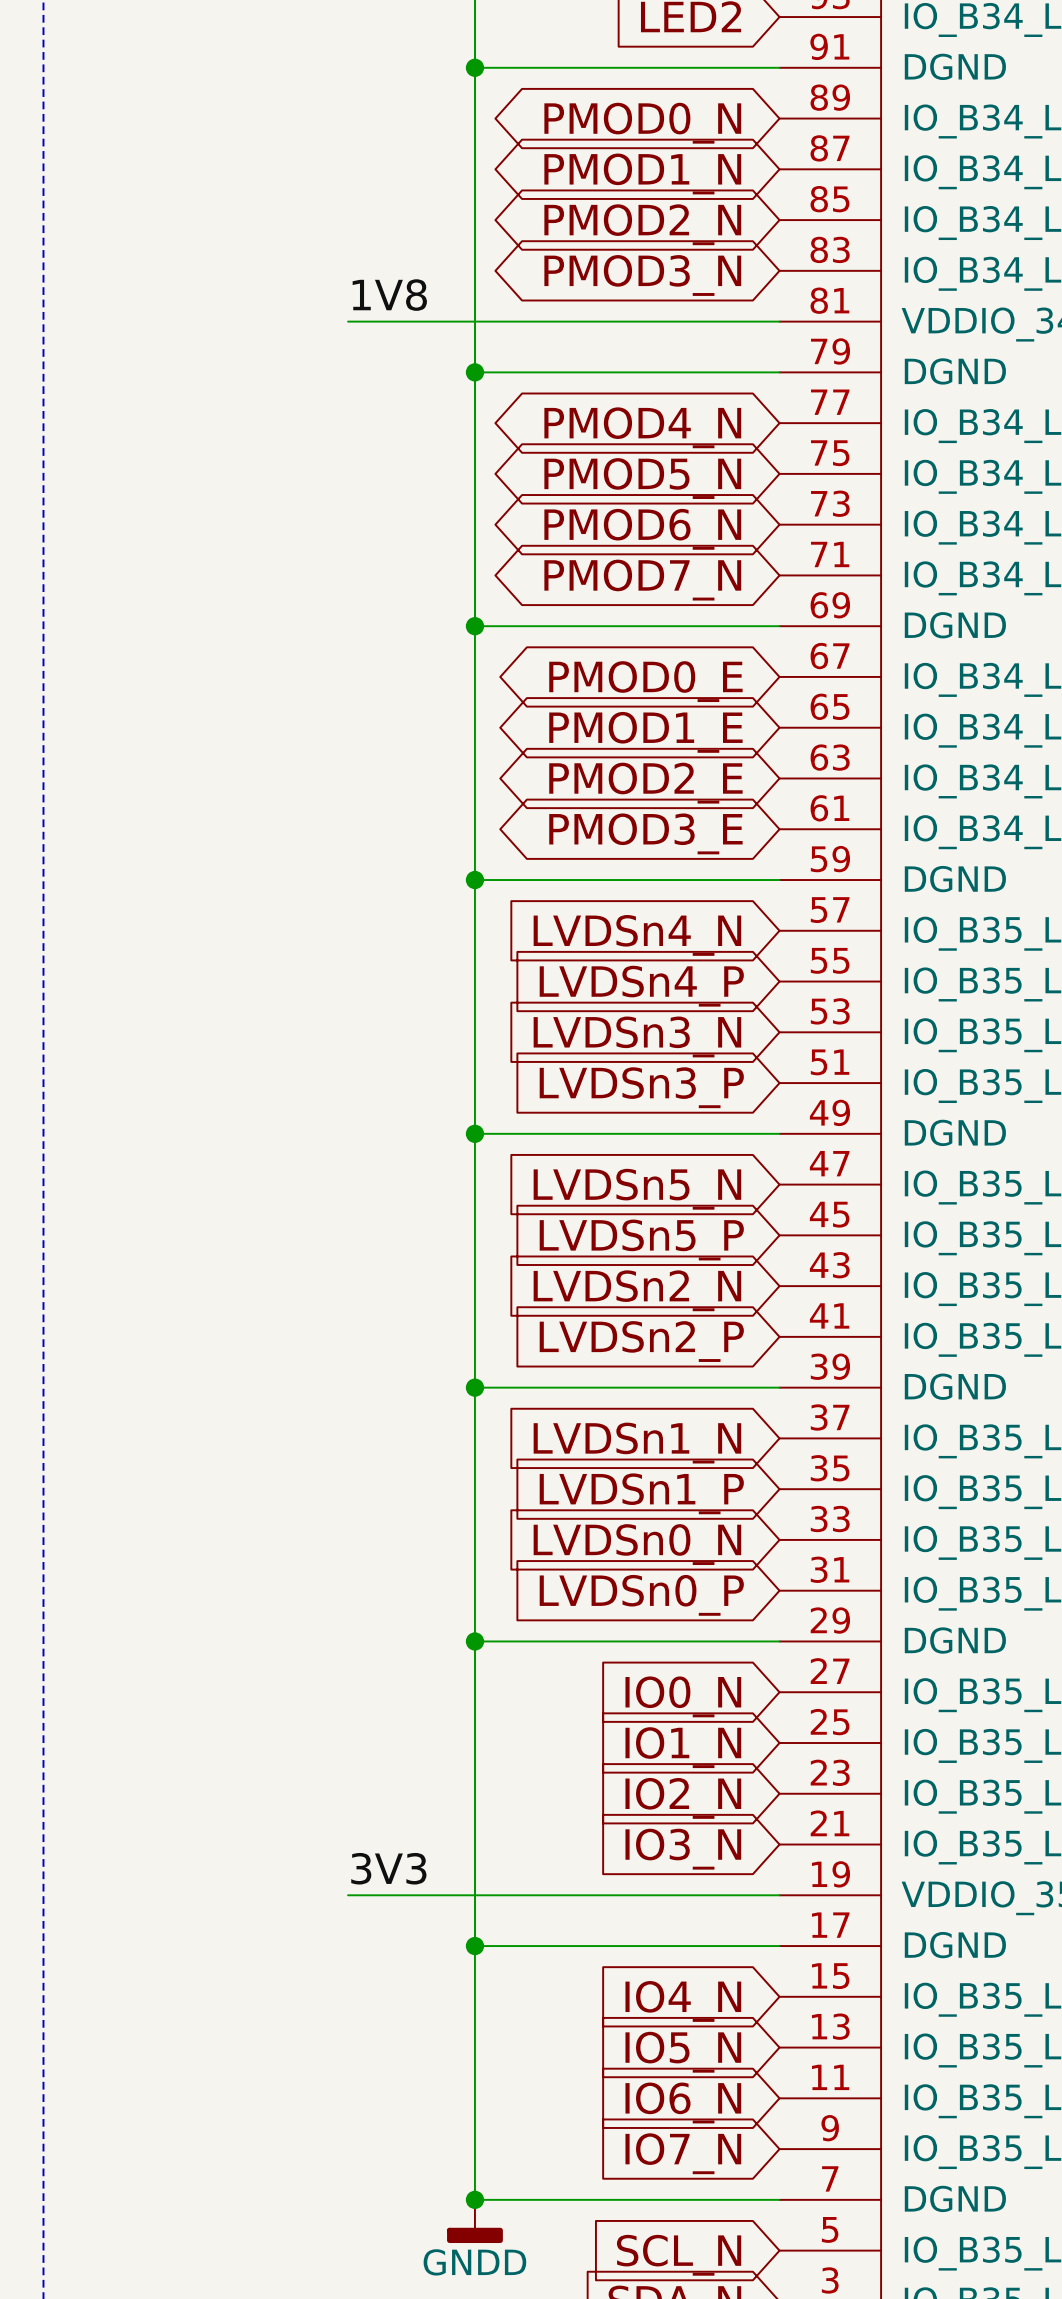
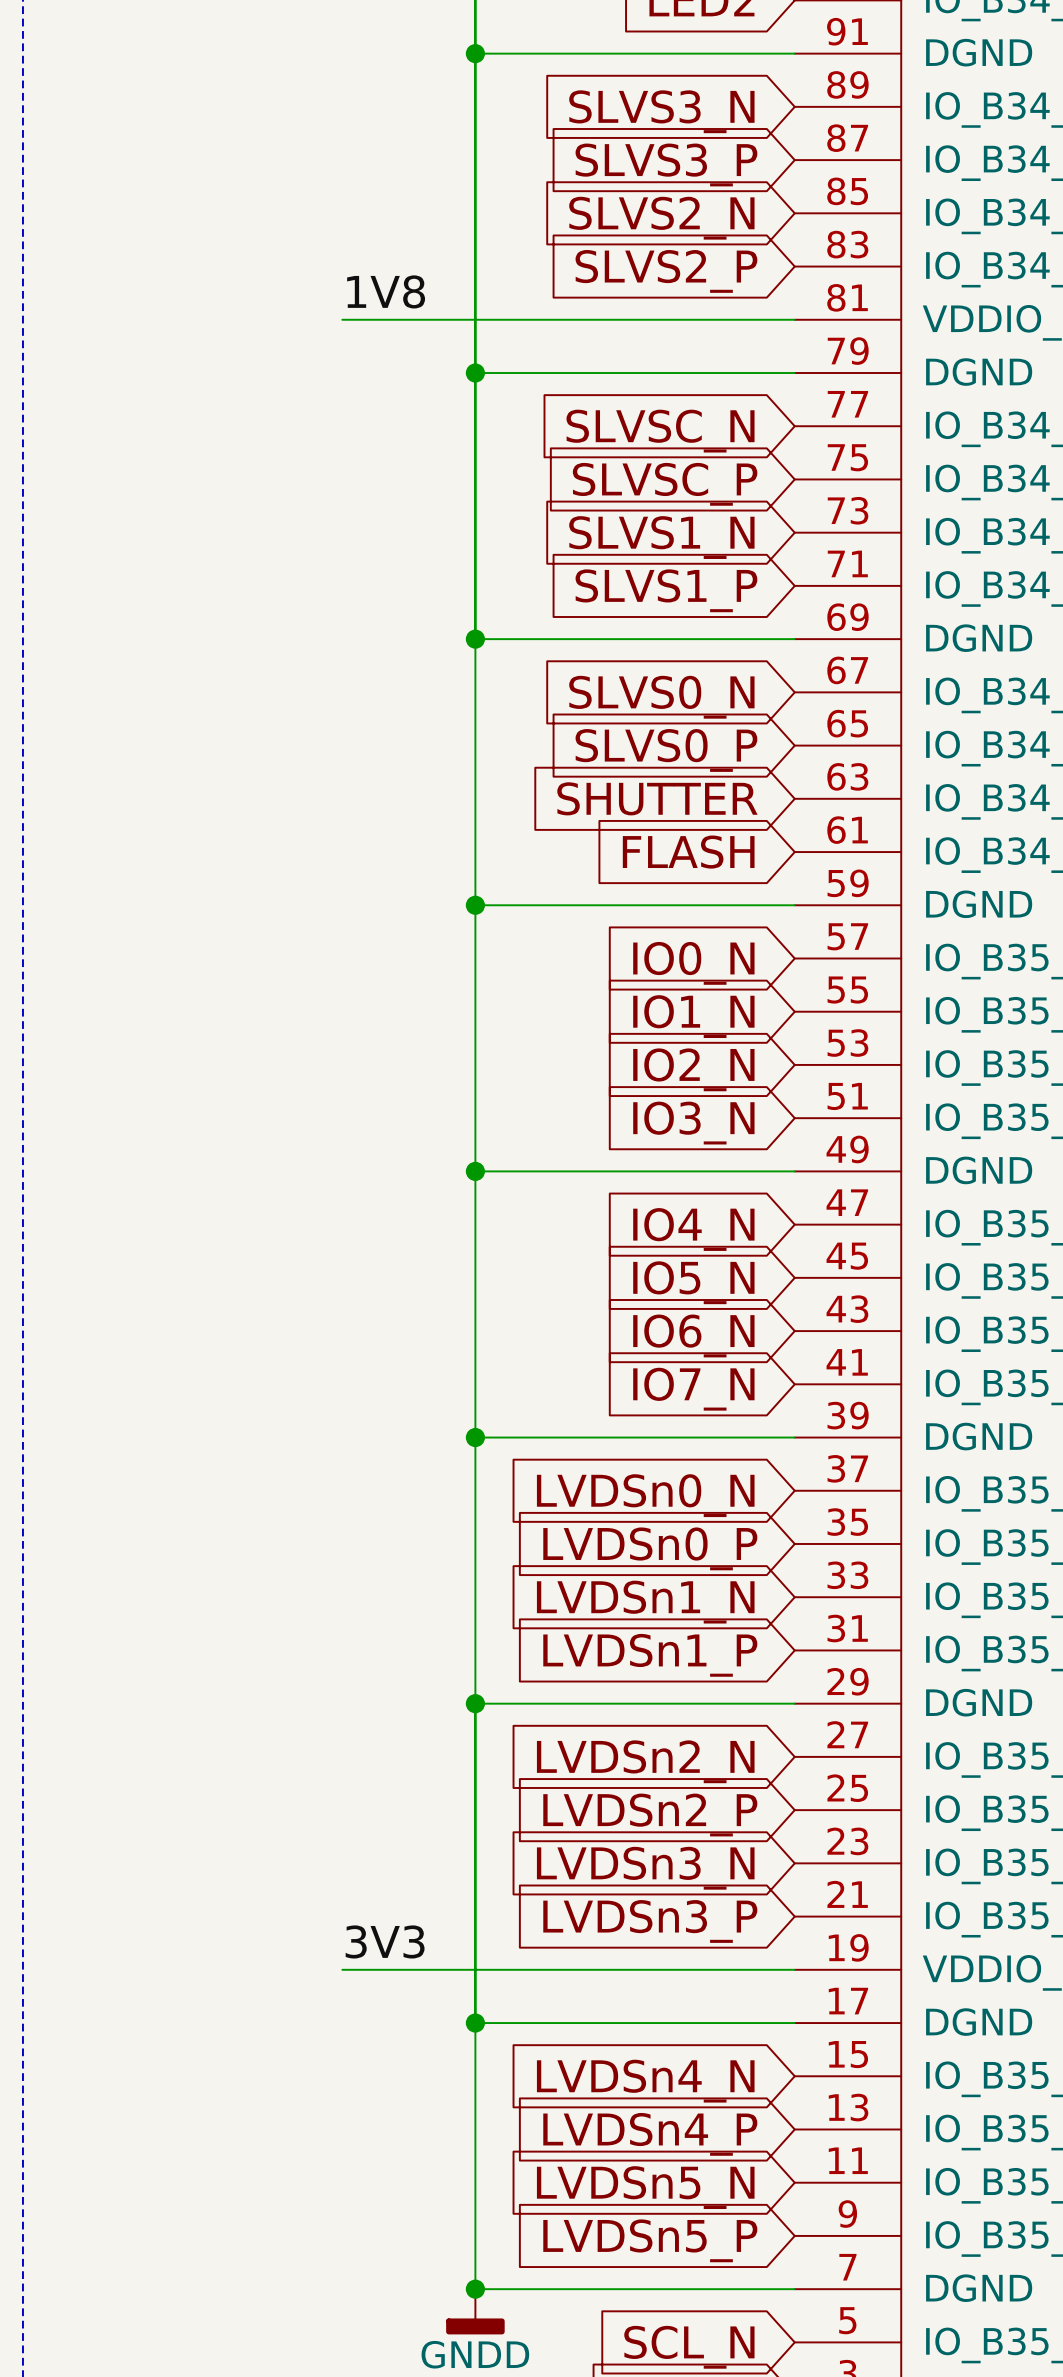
global label shape: bidirectional (642, 123) -> input (661, 111)
global label: PMOD0_N (642, 123) -> SLVS3_N (661, 111)
global label shape: bidirectional (642, 173) -> input (666, 164)
global label: PMOD1_N (642, 173) -> SLVS3_P (666, 164)
global label shape: bidirectional (642, 224) -> input (661, 218)
global label: PMOD2_N (642, 224) -> SLVS2_N (661, 218)
global label shape: bidirectional (642, 275) -> input (666, 271)
global label: PMOD3_N (642, 275) -> SLVS2_P (666, 271)
global label shape: bidirectional (642, 427) -> input (660, 431)
global label: PMOD4_N (642, 427) -> SLVSC_N (660, 431)
global label shape: bidirectional (642, 478) -> input (665, 484)
global label: PMOD5_N (642, 478) -> SLVSC_P (665, 484)
global label shape: bidirectional (642, 529) -> input (661, 537)
global label: PMOD6_N (642, 529) -> SLVS1_N (661, 537)
global label shape: bidirectional (642, 580) -> input (666, 590)
global label: PMOD7_N (642, 580) -> SLVS1_P (666, 590)
global label shape: bidirectional (645, 681) -> input (661, 697)
global label: PMOD0_E (645, 681) -> SLVS0_N (661, 697)
global label shape: bidirectional (645, 732) -> input (666, 750)
global label: PMOD1_E (645, 732) -> SLVS0_P (666, 750)
global label shape: bidirectional (645, 783) -> input (657, 798)
global label: PMOD2_E (645, 783) -> SHUTTER (657, 798)
global label shape: bidirectional (645, 833) -> input (688, 852)
global label: PMOD3_E (645, 833) -> FLASH (688, 852)
global label: LVDSn4_N (637, 935) -> IO0_N (693, 963)
global label: LVDSn4_P (641, 986) -> IO1_N (693, 1016)
global label: LVDSn3_N (637, 1036) -> IO2_N (693, 1069)
global label: LVDSn3_P (641, 1087) -> IO3_N (693, 1123)
global label: LVDSn5_N (637, 1189) -> IO4_N (693, 1229)
global label: LVDSn5_P (641, 1240) -> IO5_N (693, 1282)
global label: LVDSn2_N (637, 1290) -> IO6_N (693, 1335)
global label: LVDSn2_P (641, 1341) -> IO7_N (693, 1389)
global label: LVDSn1_N (637, 1443) -> LVDSn0_N (645, 1495)
global label: LVDSn1_P (641, 1493) -> LVDSn0_P (650, 1548)
global label: LVDSn0_N (637, 1544) -> LVDSn1_N (645, 1602)
global label: LVDSn0_P (641, 1595) -> LVDSn1_P (650, 1655)
global label: IO0_N (683, 1696) -> LVDSn2_N (645, 1761)
global label: IO1_N (683, 1747) -> LVDSn2_P (650, 1815)
global label: IO2_N (683, 1798) -> LVDSn3_N (645, 1868)
global label: IO3_N (683, 1849) -> LVDSn3_P (650, 1921)
global label: IO4_N (683, 2001) -> LVDSn4_N (645, 2081)
global label: IO5_N (683, 2052) -> LVDSn4_P (650, 2134)
global label: IO6_N (683, 2102) -> LVDSn5_N (645, 2187)
global label: IO7_N (683, 2153) -> LVDSn5_P (650, 2240)

